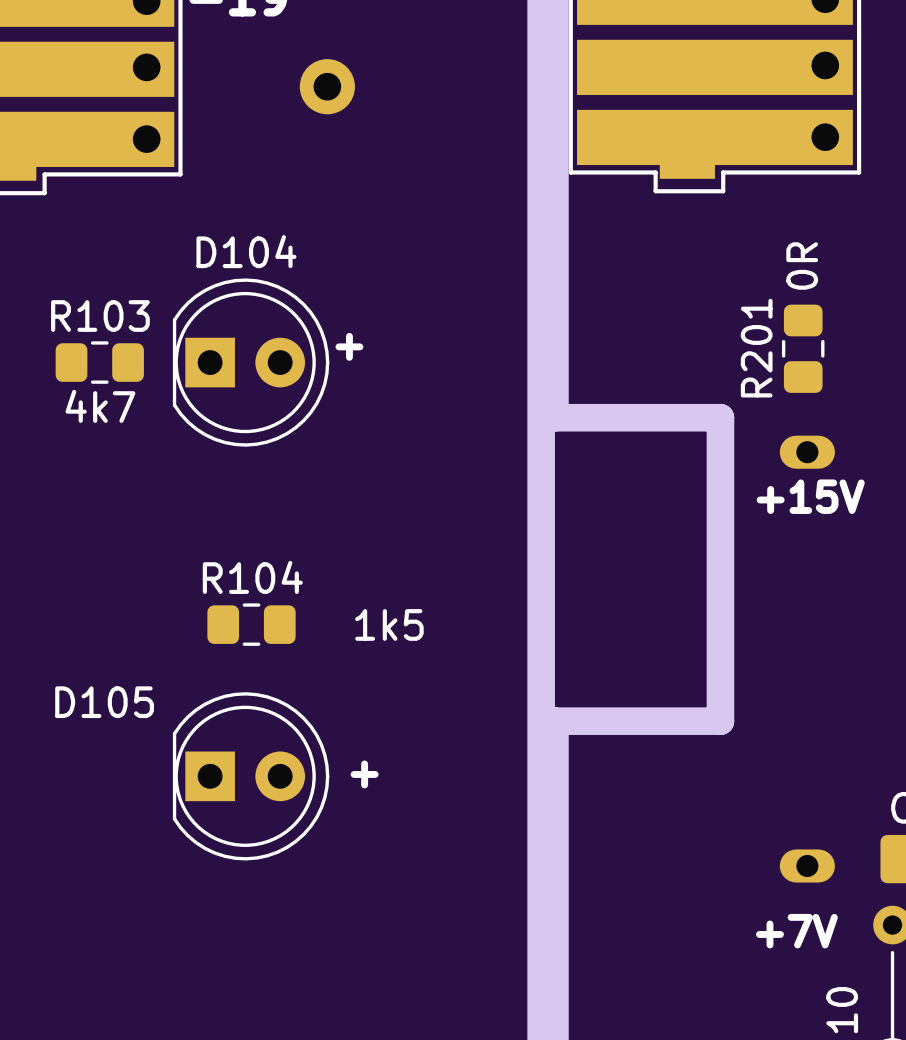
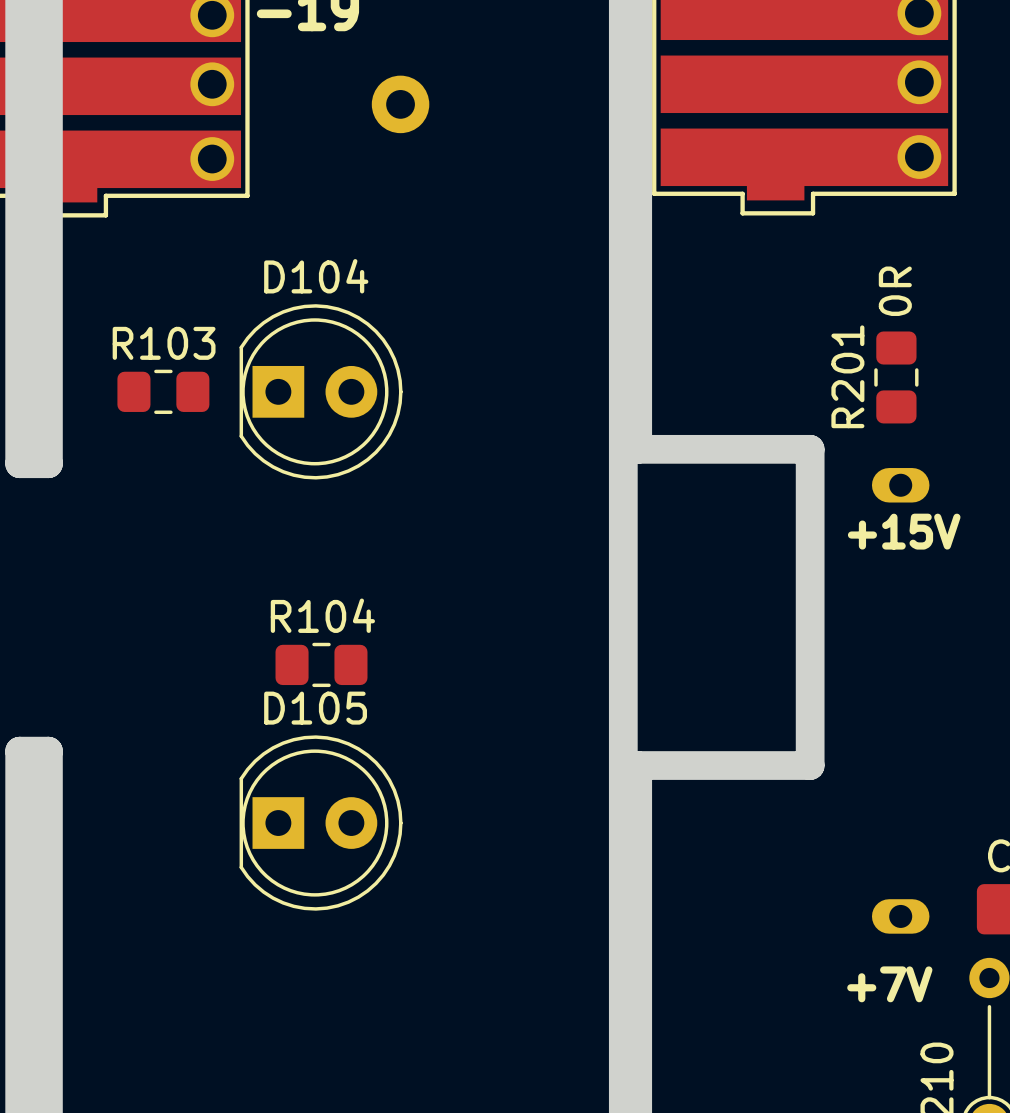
text: + (349, 346) -> none
R103 value: 4k7 (100, 406) -> none
R104 value: 1k5 (389, 624) -> none
D105 name position: D105 (104, 702) -> D105 (315, 708)
text: + (364, 774) -> none

